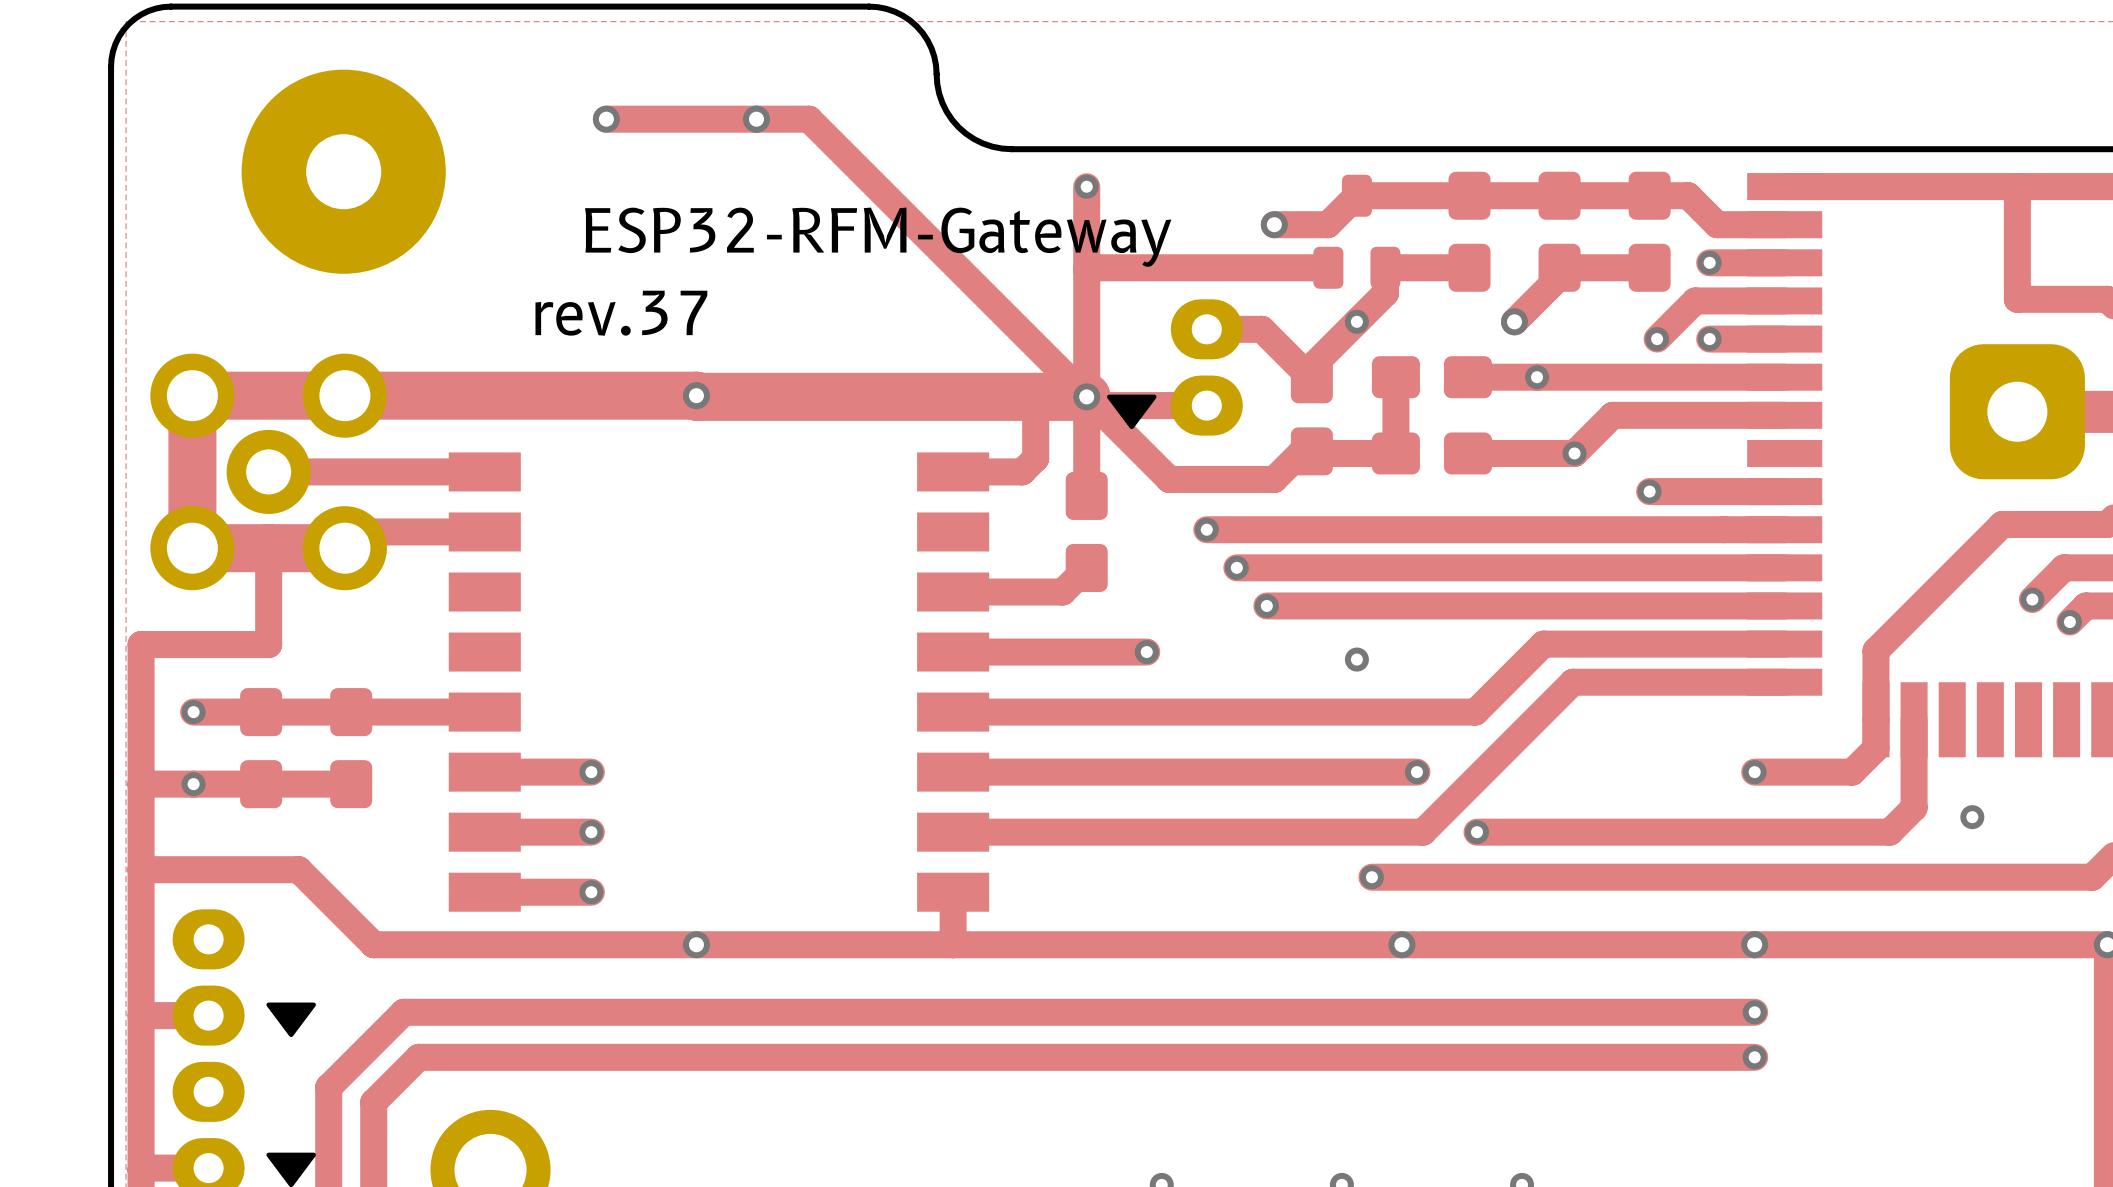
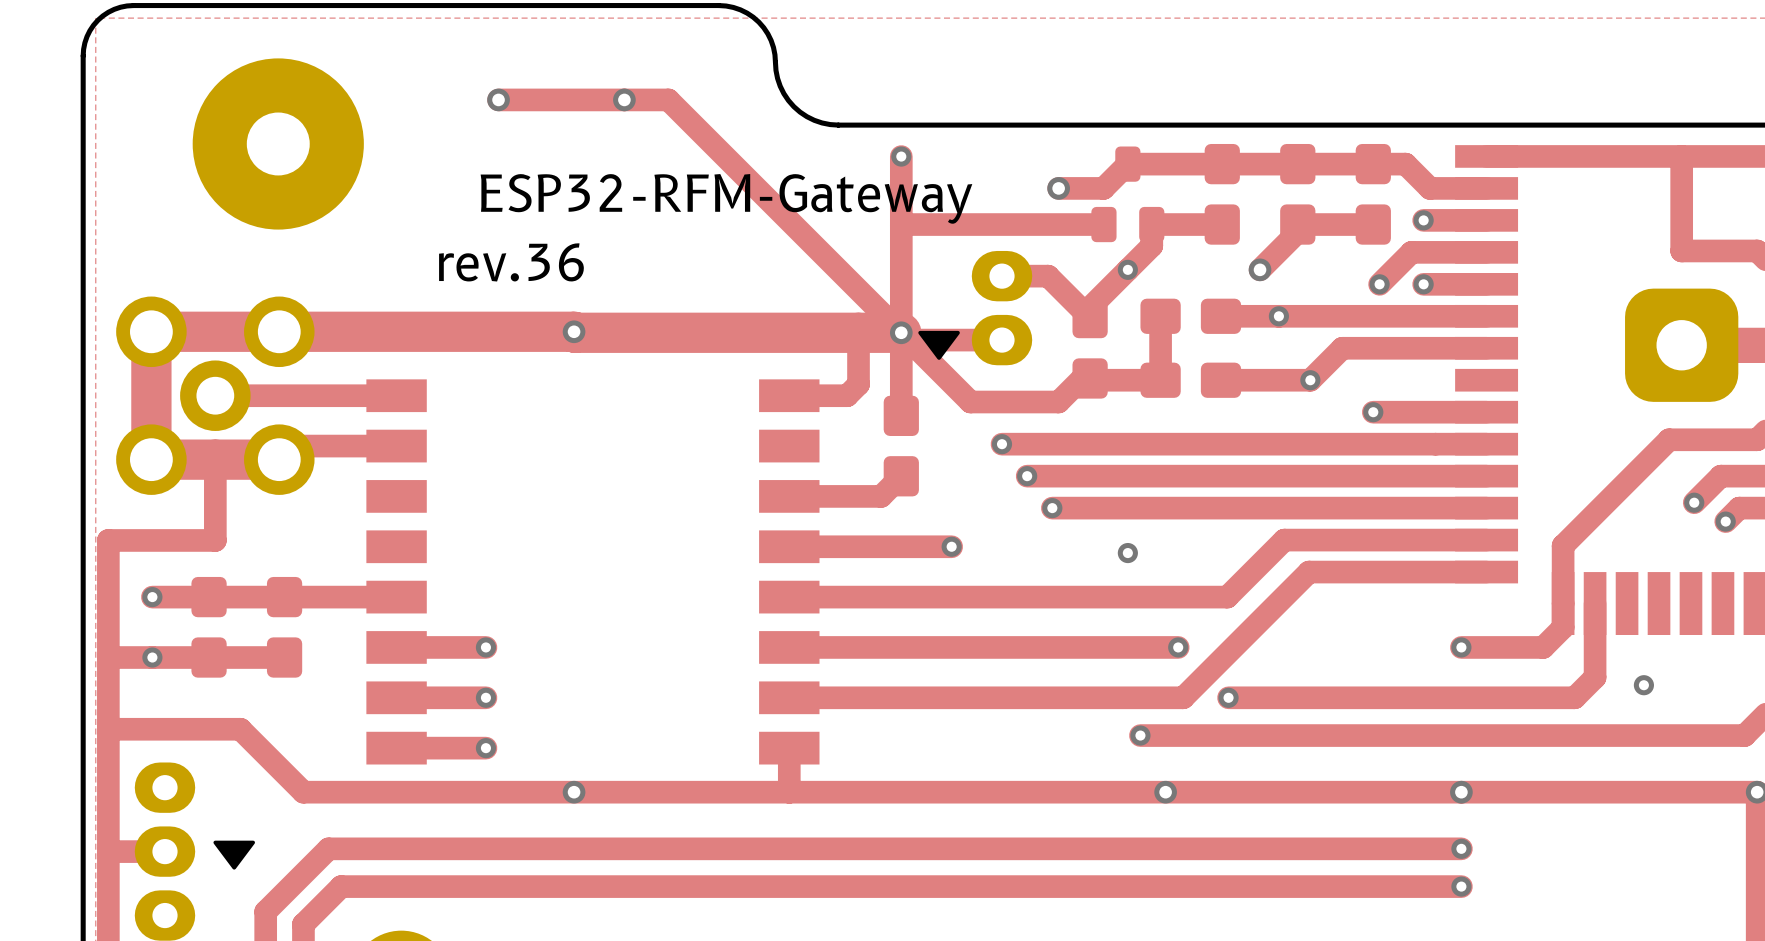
text: rev.37 (621, 313) -> rev.36 (511, 262)

